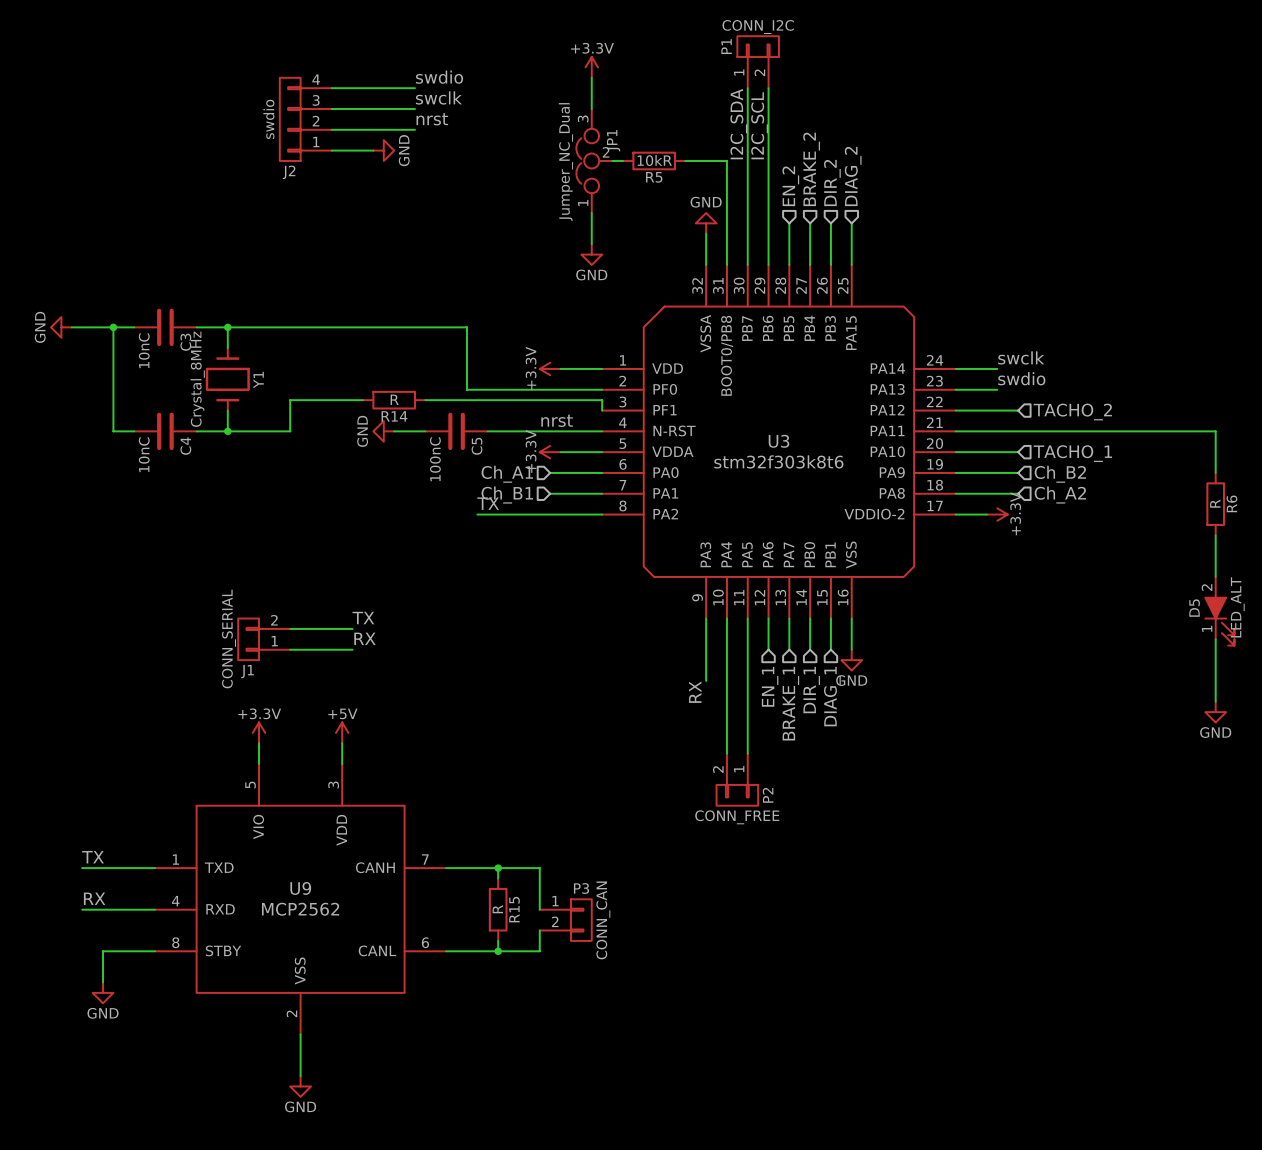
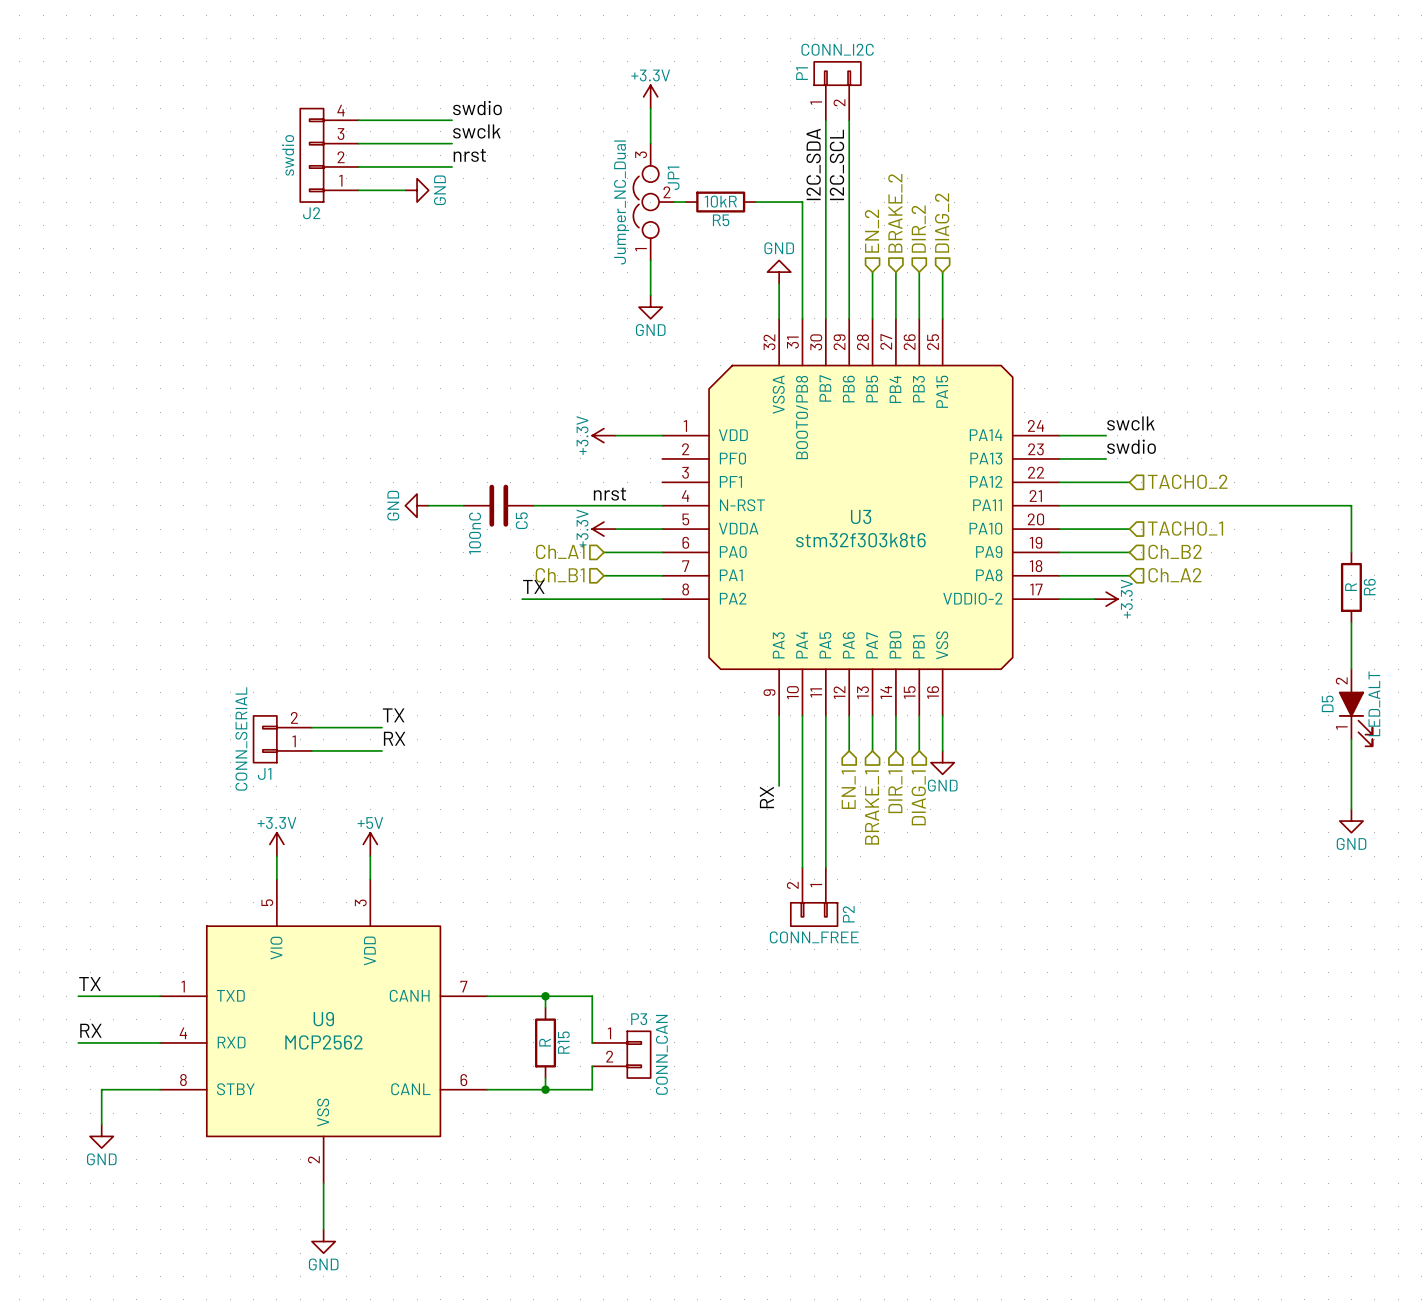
power symbol: GND (61, 327) -> none
wire: (71, 327) (134, 327) -> none
wire: (113, 327) (113, 431) (134, 431) -> none
junction: (113, 327) -> none
C3: 10nC (165, 327) -> none
wire: (196, 327) (466, 327) (466, 389) (602, 389) -> none
wire: (227, 327) (227, 348) -> none
junction: (227, 327) -> none
Y1: Crystal_8MHz (227, 379) -> none
wire: (362, 400) (290, 400) (290, 431) (196, 431) -> none
R14: R (394, 400) -> none
wire: (425, 400) (602, 400) (602, 410) -> none
wire: (227, 410) (227, 431) -> none
C4: 10nC (165, 431) -> none
junction: (227, 431) -> none

